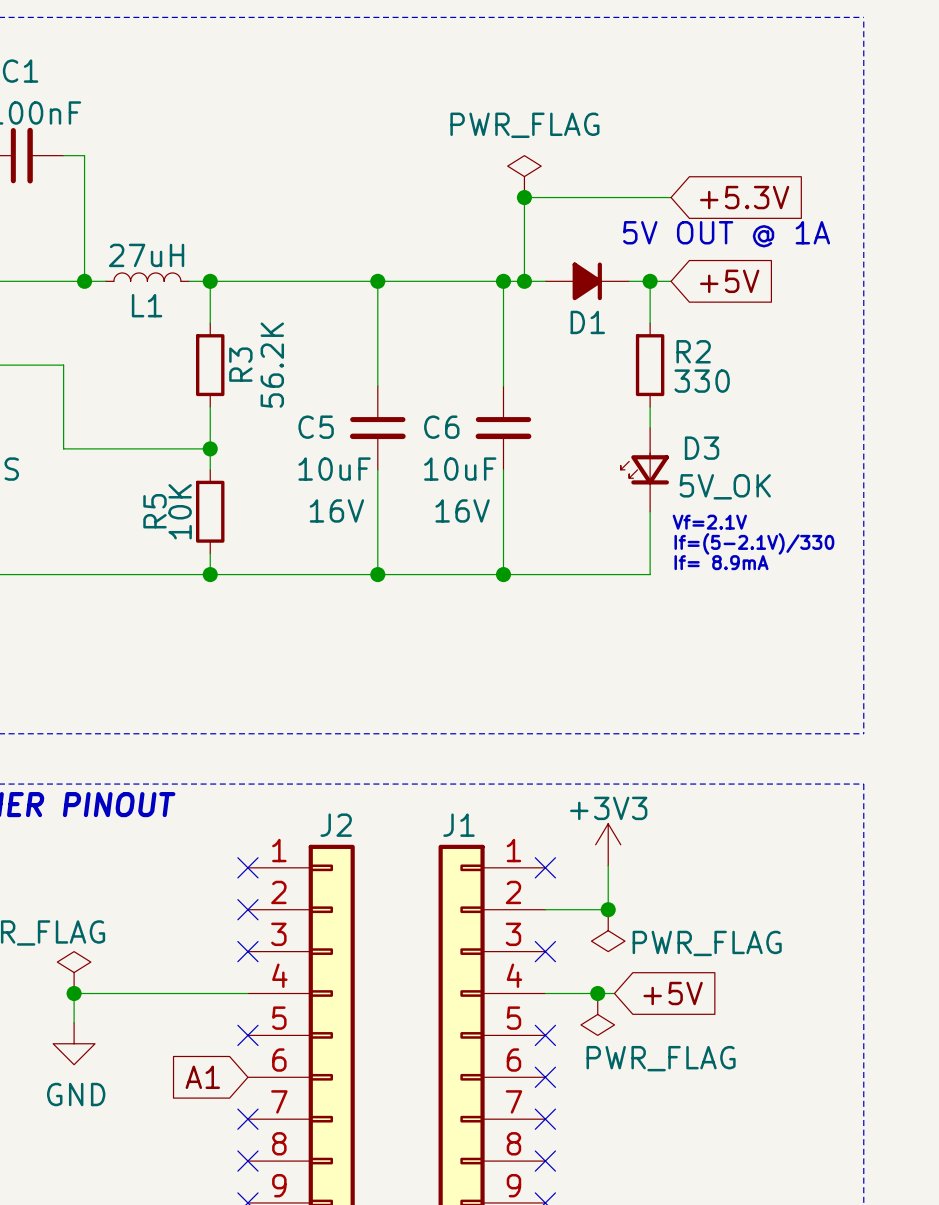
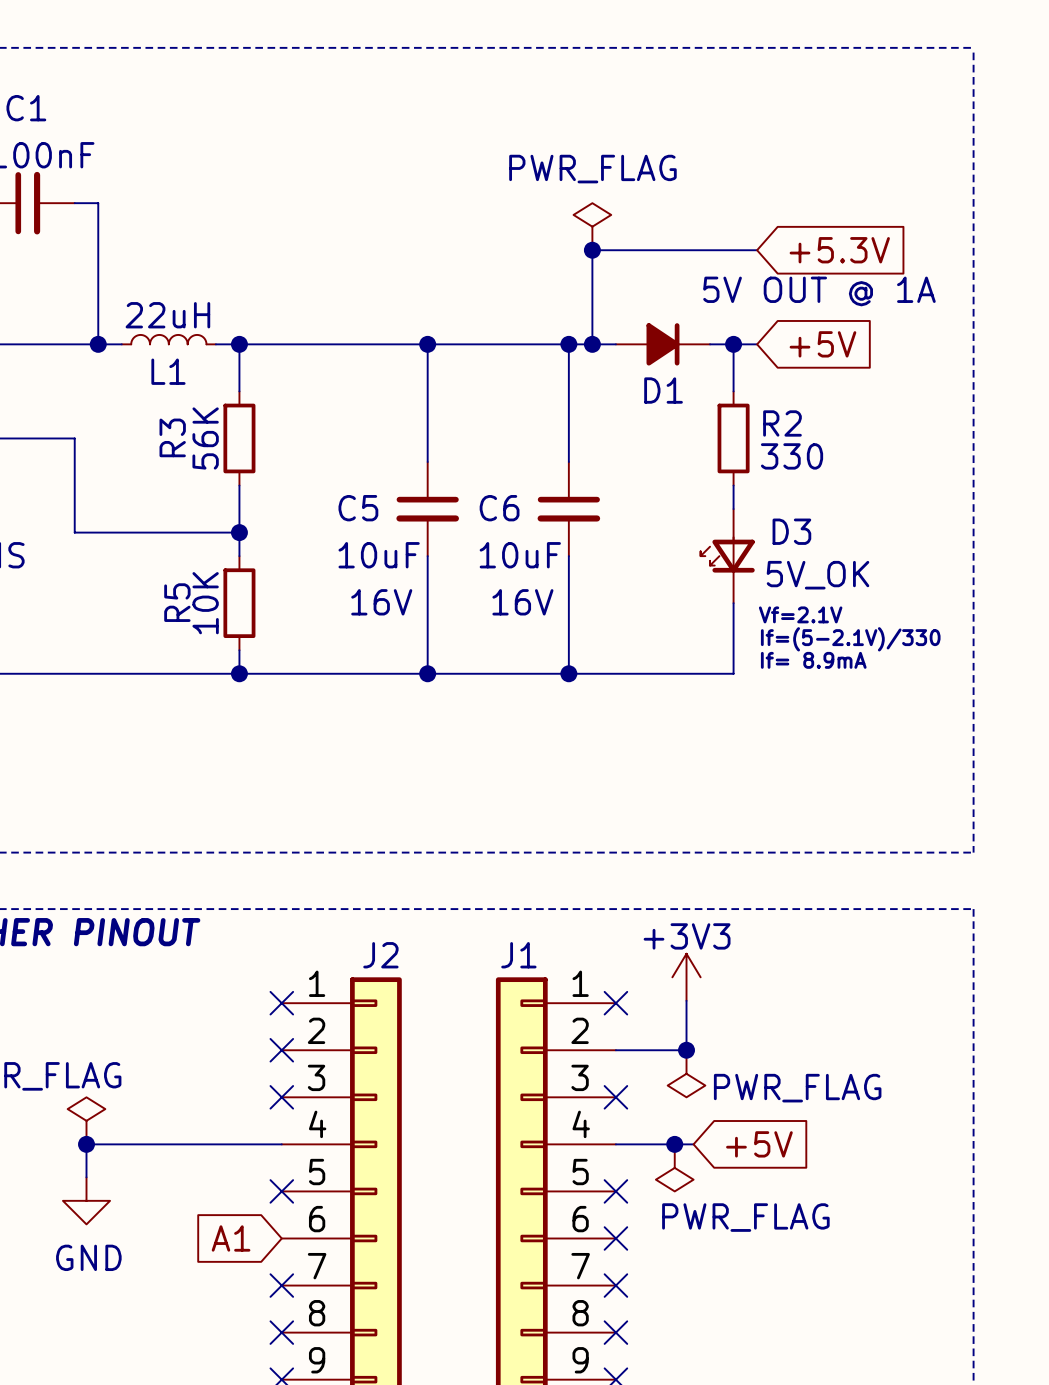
L1 value: 27uH (146, 255) -> 22uH (167, 315)
R3 name position: R3 (240, 364) -> R3 (172, 437)
R3 value: 56.2K (272, 365) -> 56K (205, 438)

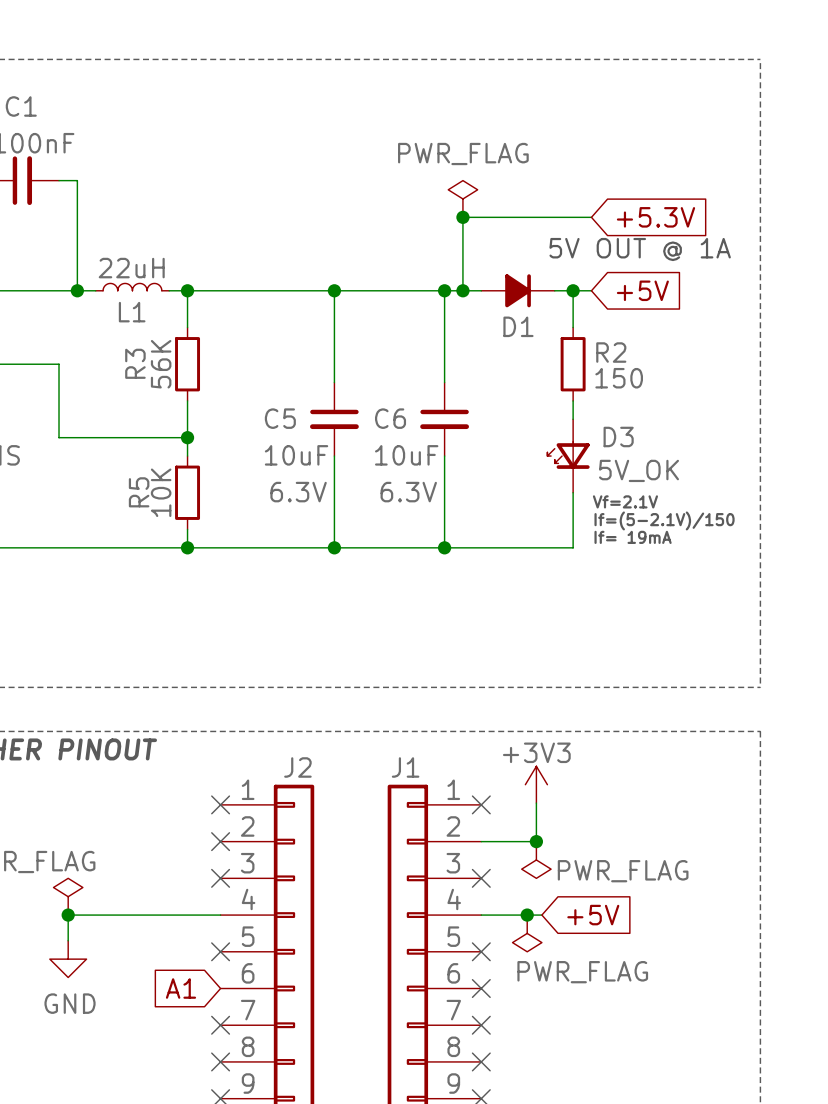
R2 value: 330 (792, 456) -> 150 (619, 378)
C5 text: 16V (381, 602) -> 6.3V (298, 492)
C6 text: 16V (522, 602) -> 6.3V (408, 492)
text: If=(5-2.1V)/330 (850, 639) -> If=(5-2.1V)/150 (664, 520)
text: If= 8.9mA (813, 660) -> If= 19mA (633, 537)

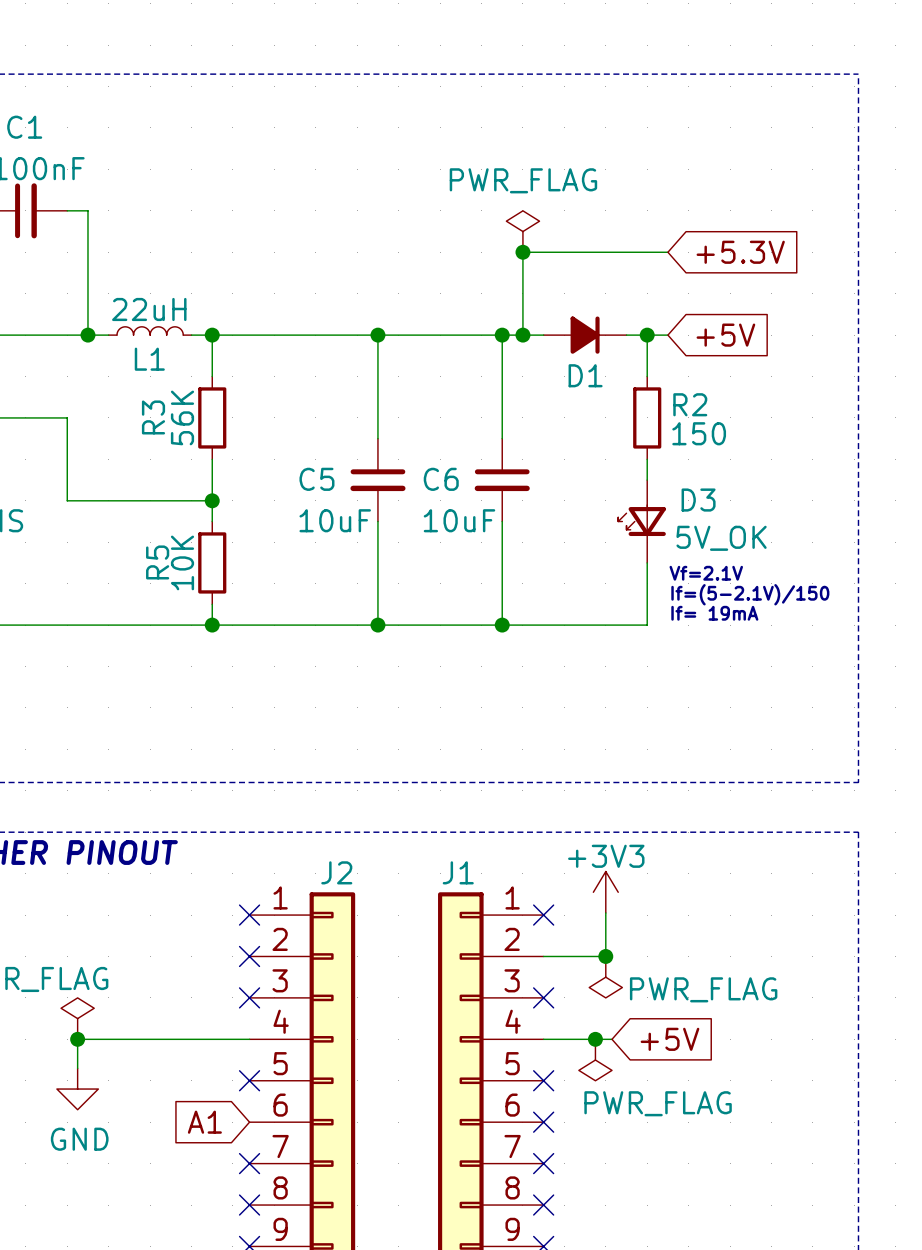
text: 5V OUT @ 1A (640, 249) -> none
C5 text: 6.3V (298, 492) -> none
C6 text: 6.3V (408, 492) -> none

